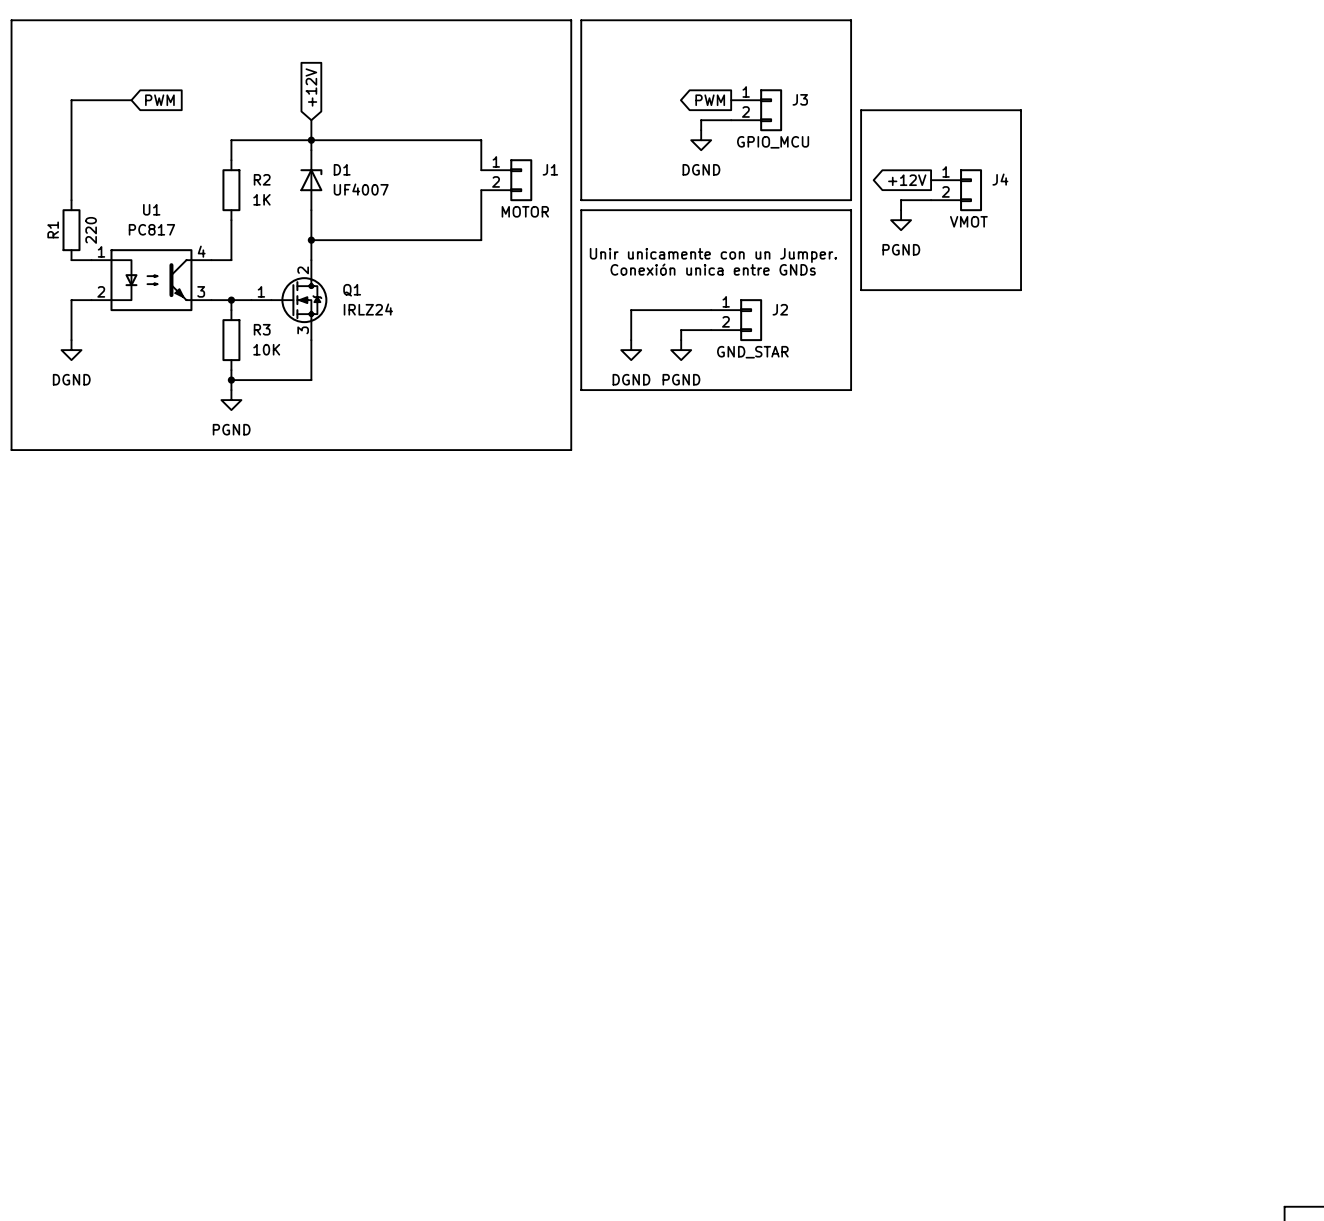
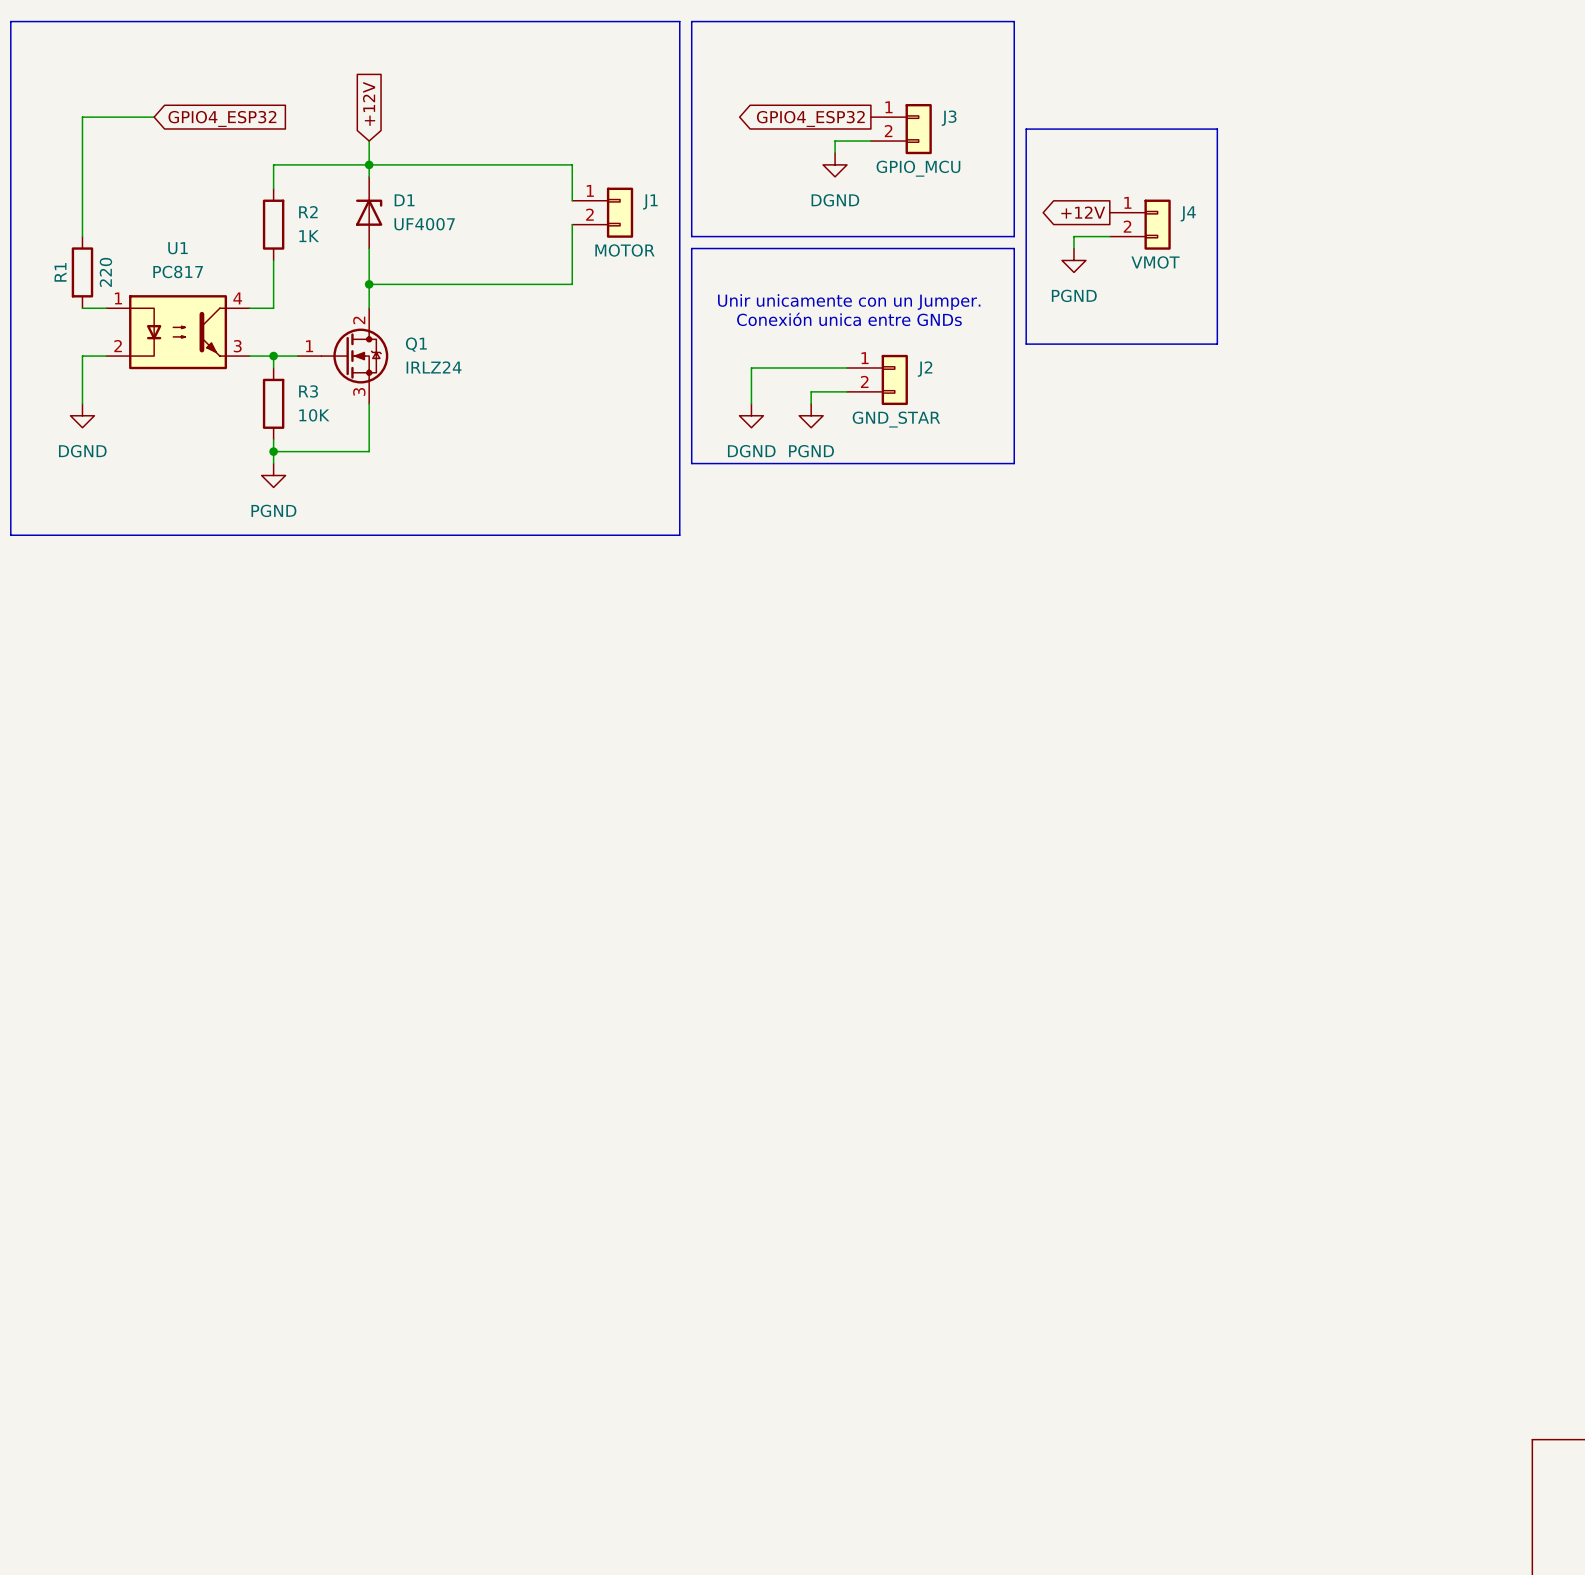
global label: PWM (159, 100) -> GPIO4_ESP32 (222, 118)
global label: PWM (710, 100) -> GPIO4_ESP32 (810, 118)

